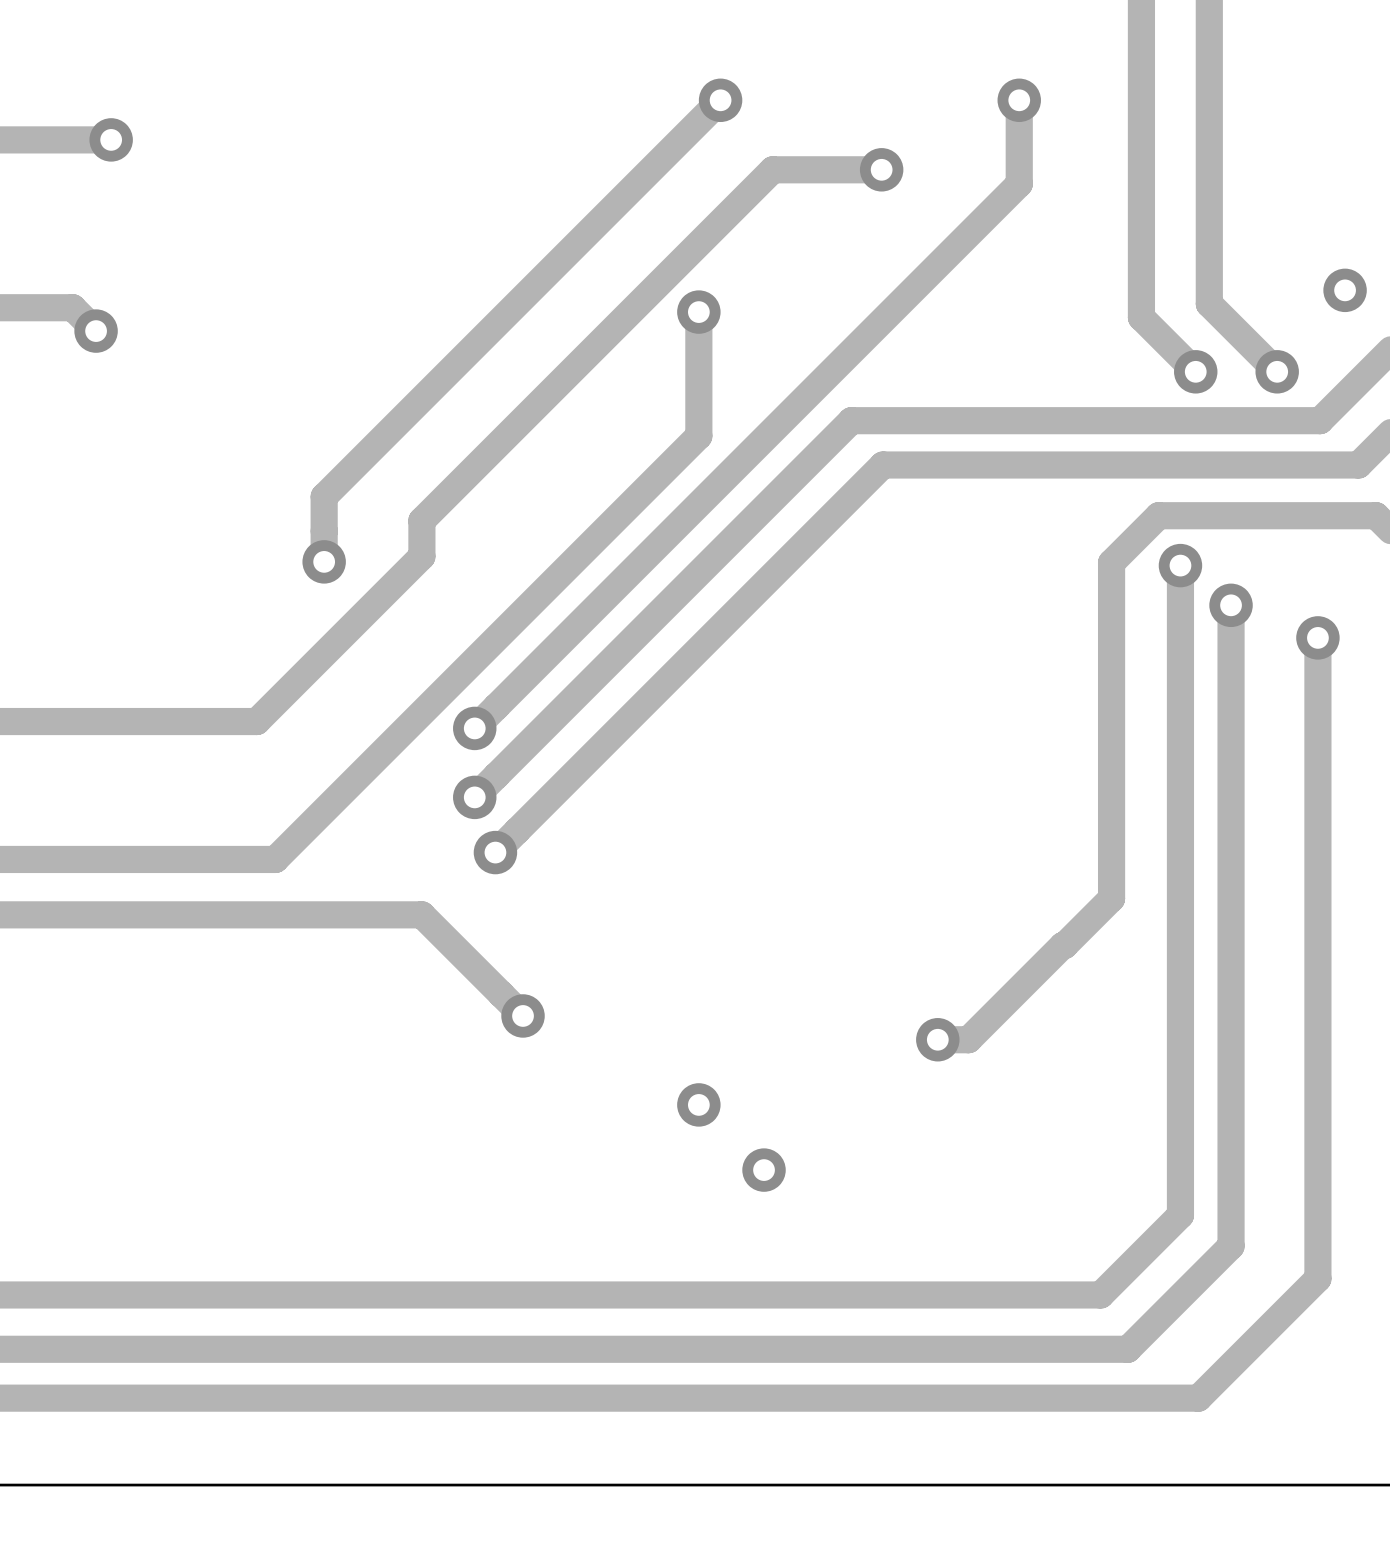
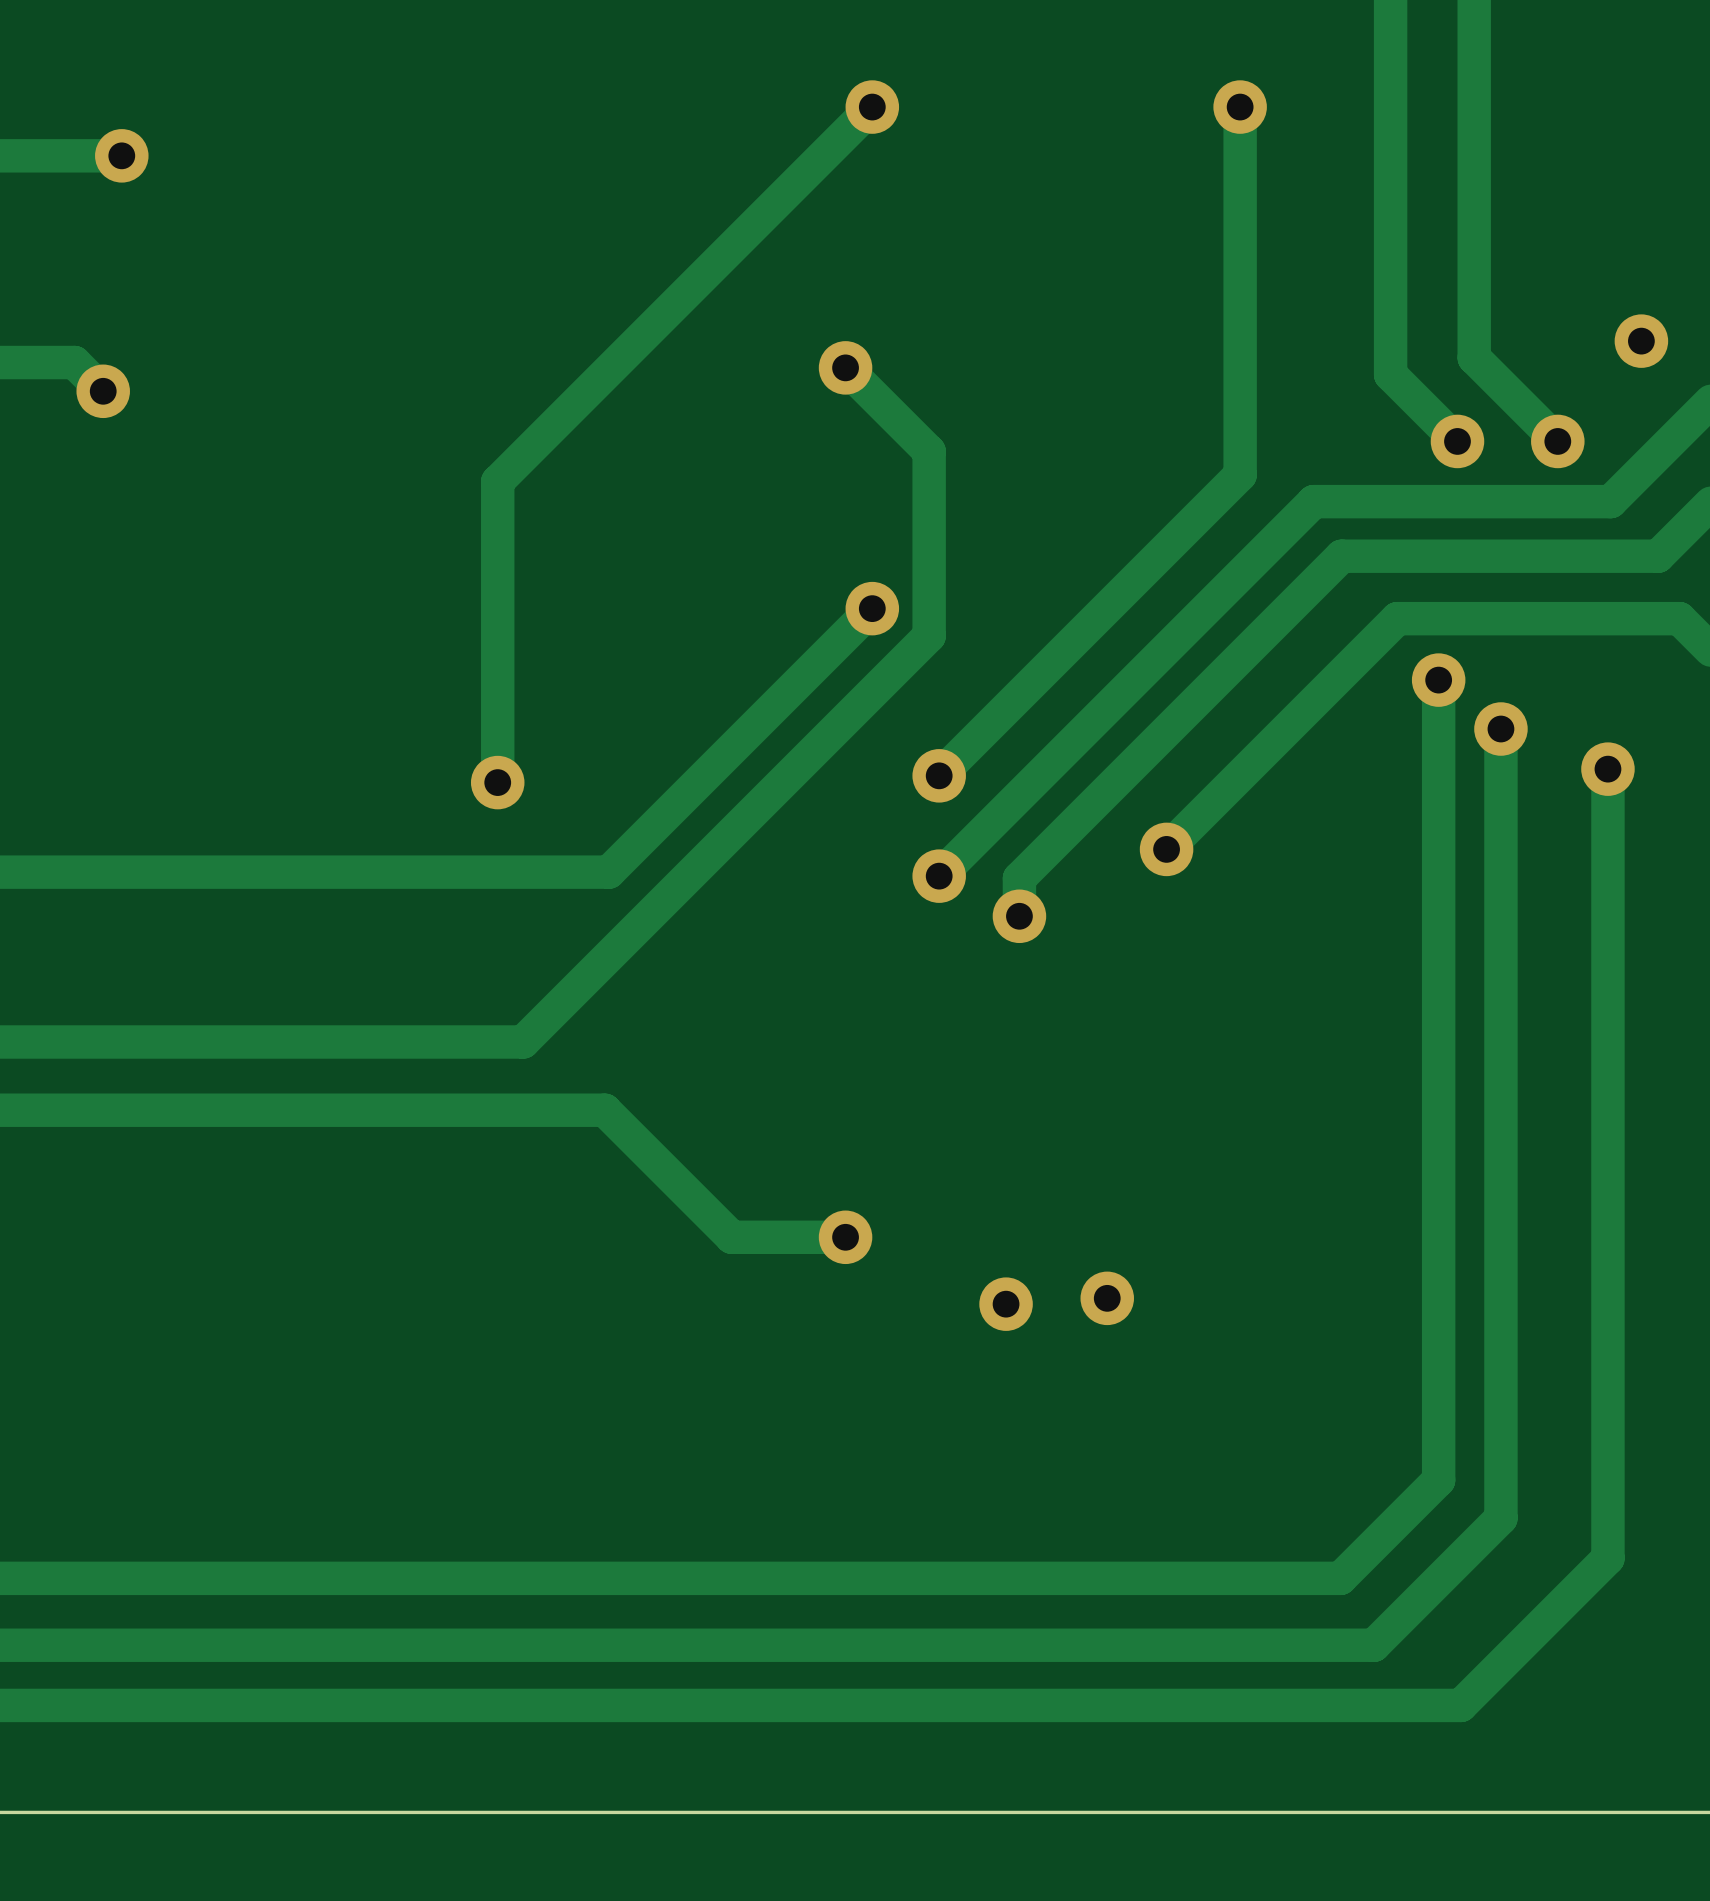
track: (881, 169) (772, 169) (421, 520) (421, 556) (256, 721) -> (872, 608) (608, 872) (301, 872)
via: (881, 169) -> none
track: (1019, 183) (474, 728) -> (1240, 210) (1240, 474) (939, 775)
track: (698, 312) (698, 436) (275, 859) -> (845, 367) (929, 451) (929, 635) (523, 1042) (324, 1042)
track: (416, 404) (324, 496) (324, 561) -> (497, 481) (497, 782)
track: (1078, 420) (851, 420) (474, 797) -> (1313, 501) (939, 876)
track: (1101, 464) (883, 464) (495, 852) -> (1341, 556) (1019, 878) (1019, 916)
via: none -> (872, 608)
track: (1158, 515) (1111, 562) (1111, 898) (968, 1039) (937, 1039) -> (1411, 618) (1397, 618) (1166, 849)
via: (324, 561) -> none
via: none -> (939, 775)
via: none -> (497, 782)
via: none -> (1166, 849)
via: none -> (939, 876)
via: (474, 728) -> none
via: none -> (1019, 916)
via: (474, 797) -> none
via: (495, 852) -> none
track: (421, 914) (523, 1015) -> (504, 1110) (604, 1110) (731, 1237) (845, 1237)
via: (523, 1015) -> none
via: none -> (845, 1237)
via position: (937, 1039) -> (1107, 1298)
via: none -> (1006, 1304)
via: (698, 1104) -> none
via: (764, 1170) -> none

